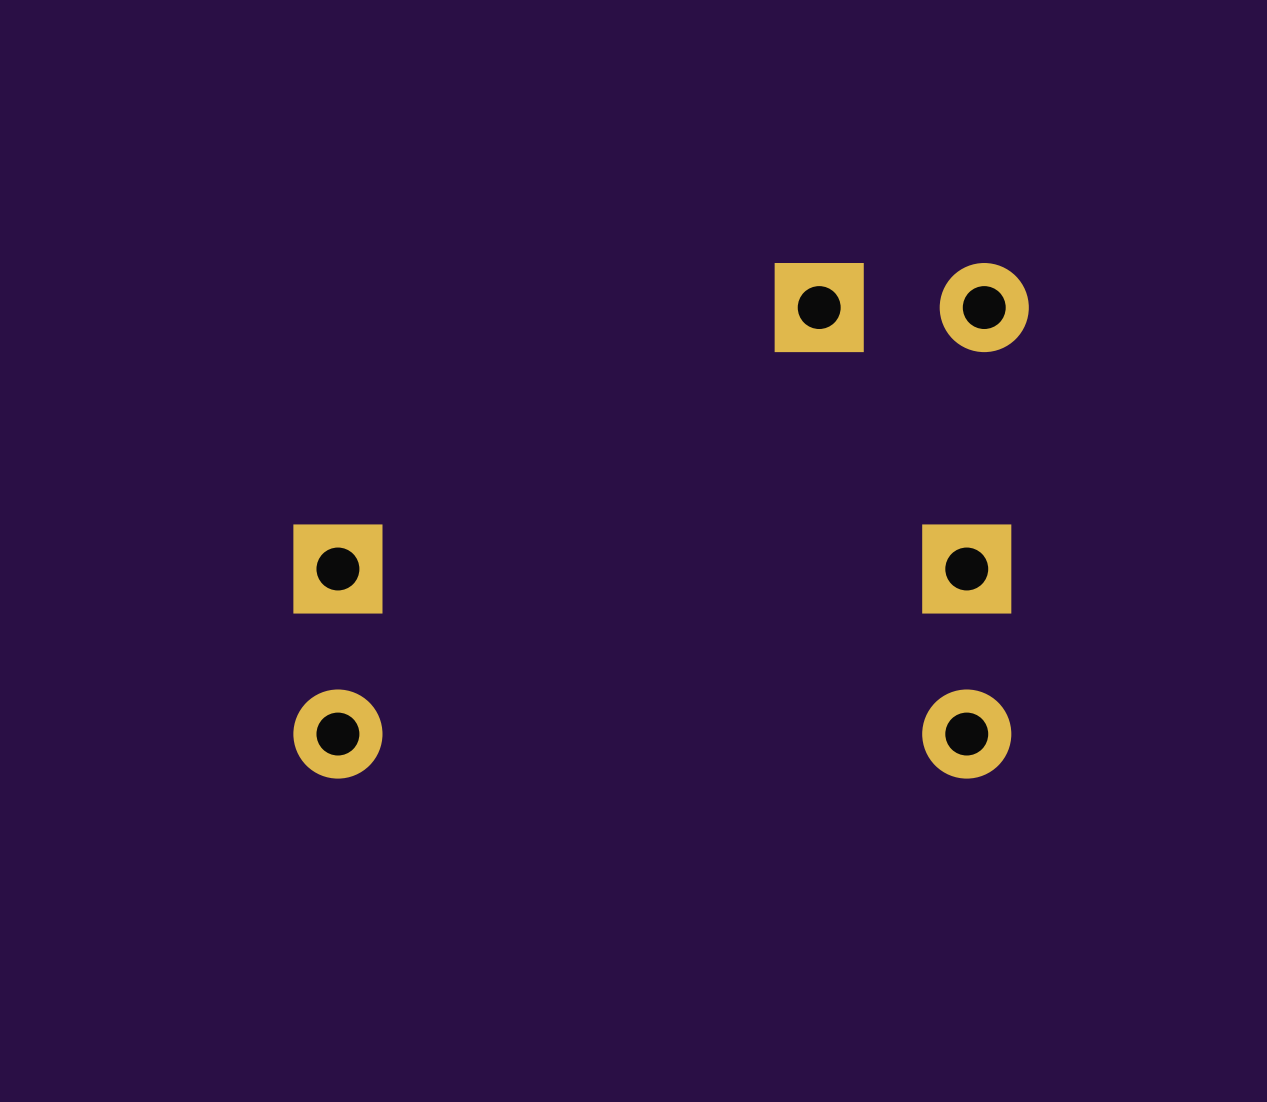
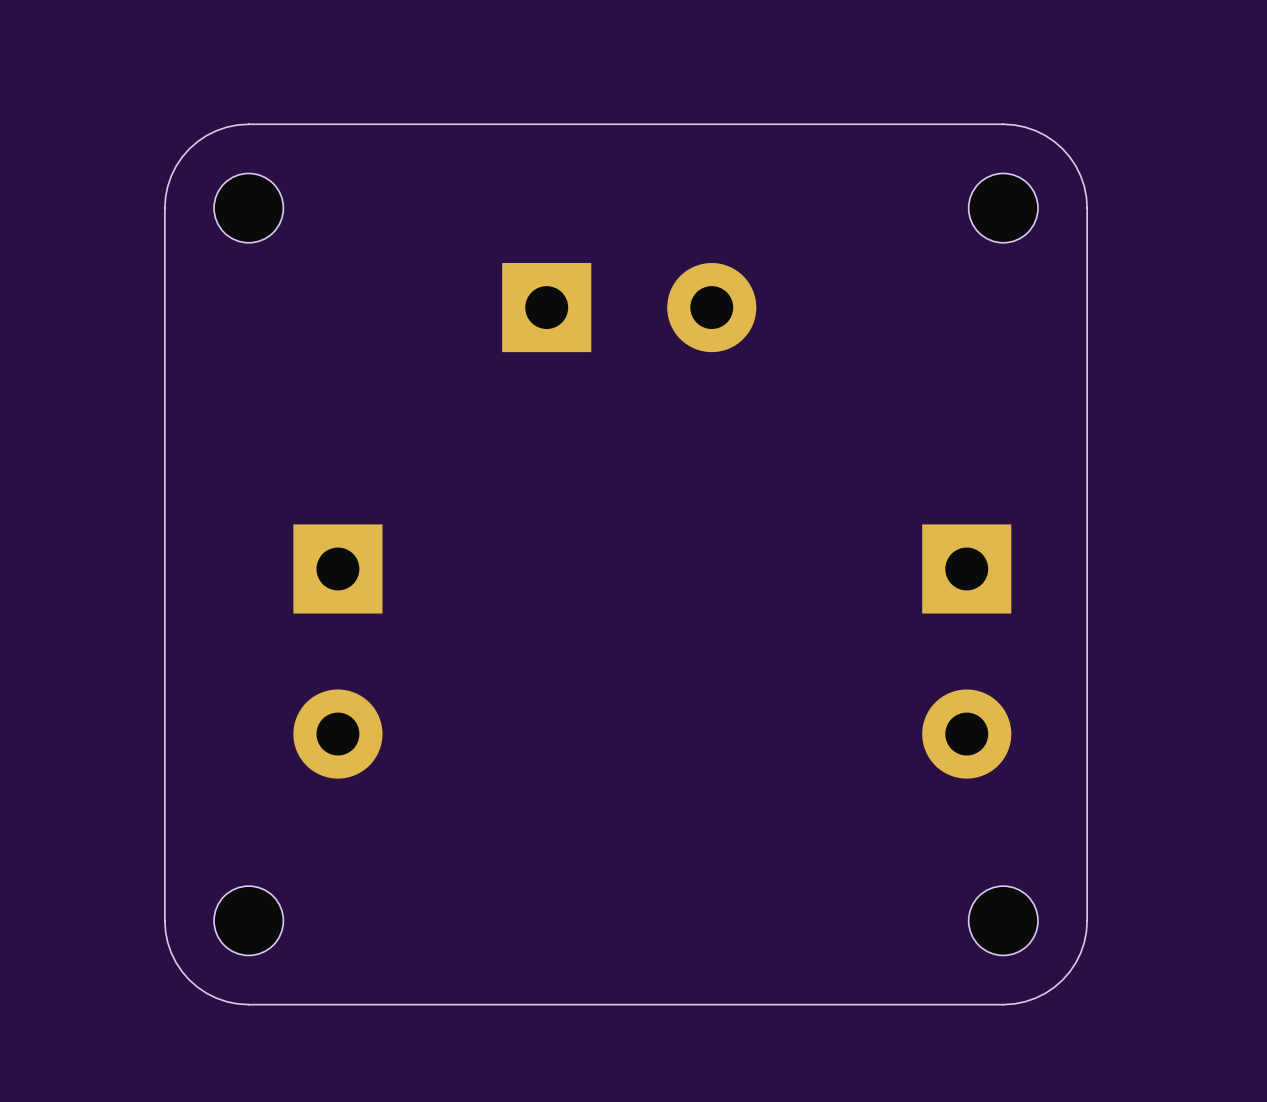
board edge: none -> (1003, 124) (248, 124) (216, 130) (189, 148) (171, 176) (164, 208) (164, 920) (171, 952) (189, 980) (216, 998) (248, 1004) (1003, 1004) (1035, 998) (1062, 980) (1080, 952) (1087, 920) (1086, 197) (1075, 166) (1054, 141) (1025, 127) (1003, 124)
part: none -> (248, 208)
part: none -> (1003, 208)
part position: (901, 307) -> (629, 307)
part: none -> (248, 920)
part: none -> (1003, 920)

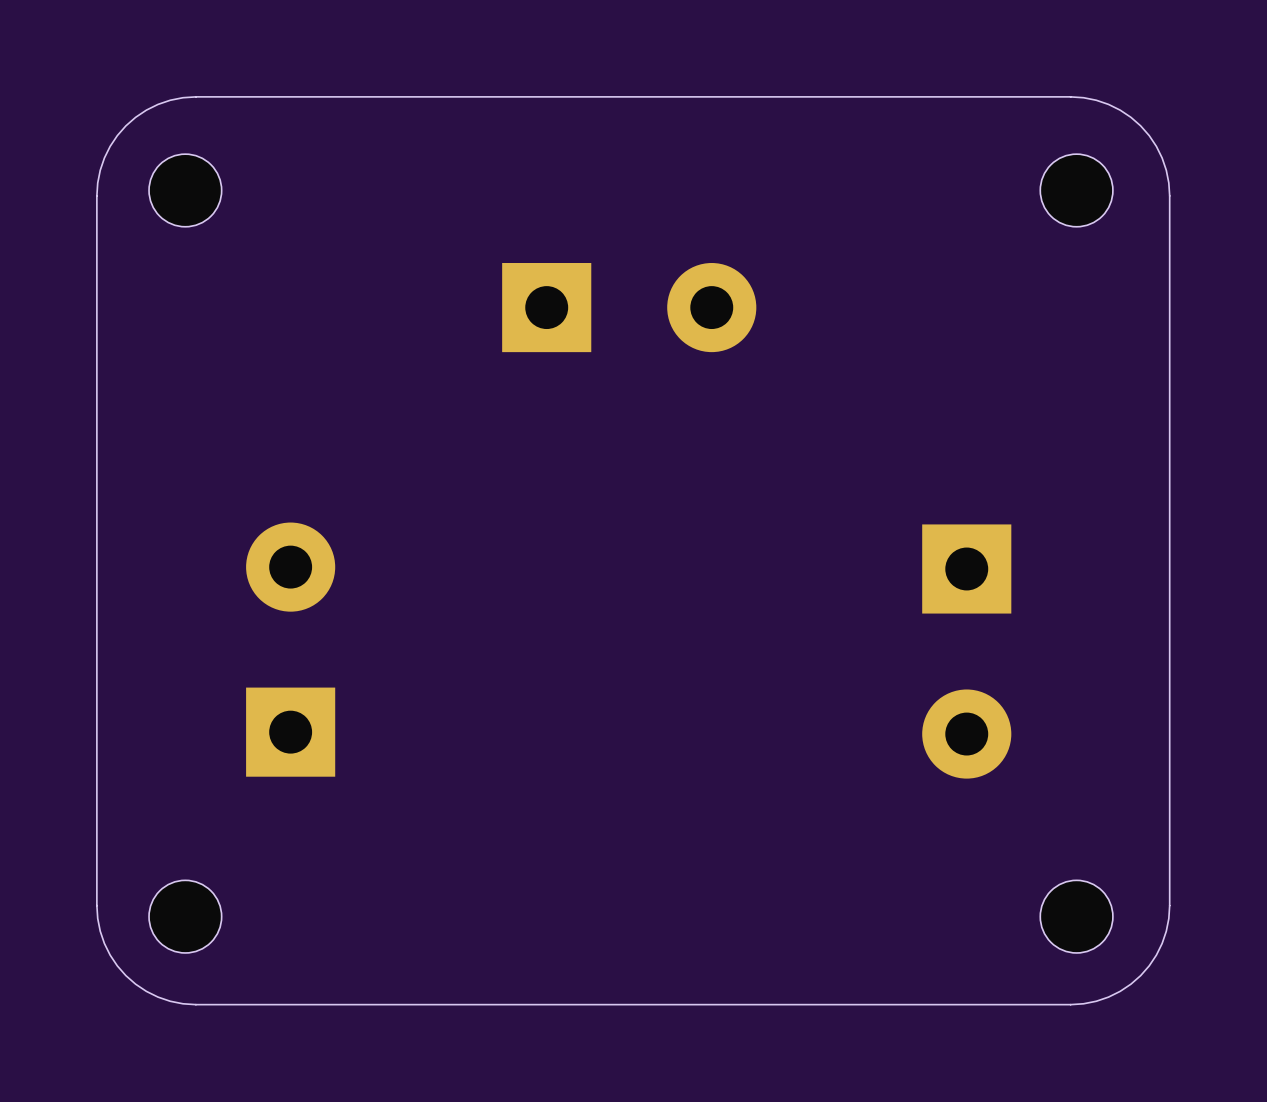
part: none -> (185, 190)
part: none -> (1076, 190)
part: (248, 208) -> none
part: (1003, 208) -> none
part rotation: 0° (337, 651) -> 180° (290, 649)
part: none -> (185, 916)
part: none -> (1076, 916)
part: (248, 920) -> none
part: (1003, 920) -> none
board edge: (1003, 1004) (1035, 998) (1062, 980) (1080, 952) (1087, 920) (1086, 197) (1075, 166) (1054, 141) (1025, 127) (1003, 124) (248, 124) (227, 127) (206, 135) (182, 157) (167, 186) (164, 208) (165, 931) (176, 962) (197, 987) (227, 1001) (248, 1004) -> (1003, 1004) (1083, 1003) (1096, 1001) (1120, 991) (1130, 984) (1149, 965) (1162, 943) (1168, 918) (1168, 182) (1166, 170) (1156, 146) (1140, 125) (1120, 110) (1108, 104) (1083, 97) (195, 96) (170, 100) (158, 104) (146, 110) (125, 125) (110, 146) (104, 158) (97, 182) (96, 195) (97, 918) (104, 943) (117, 965) (125, 975) (146, 991) (158, 997) (182, 1003) (248, 1004)

